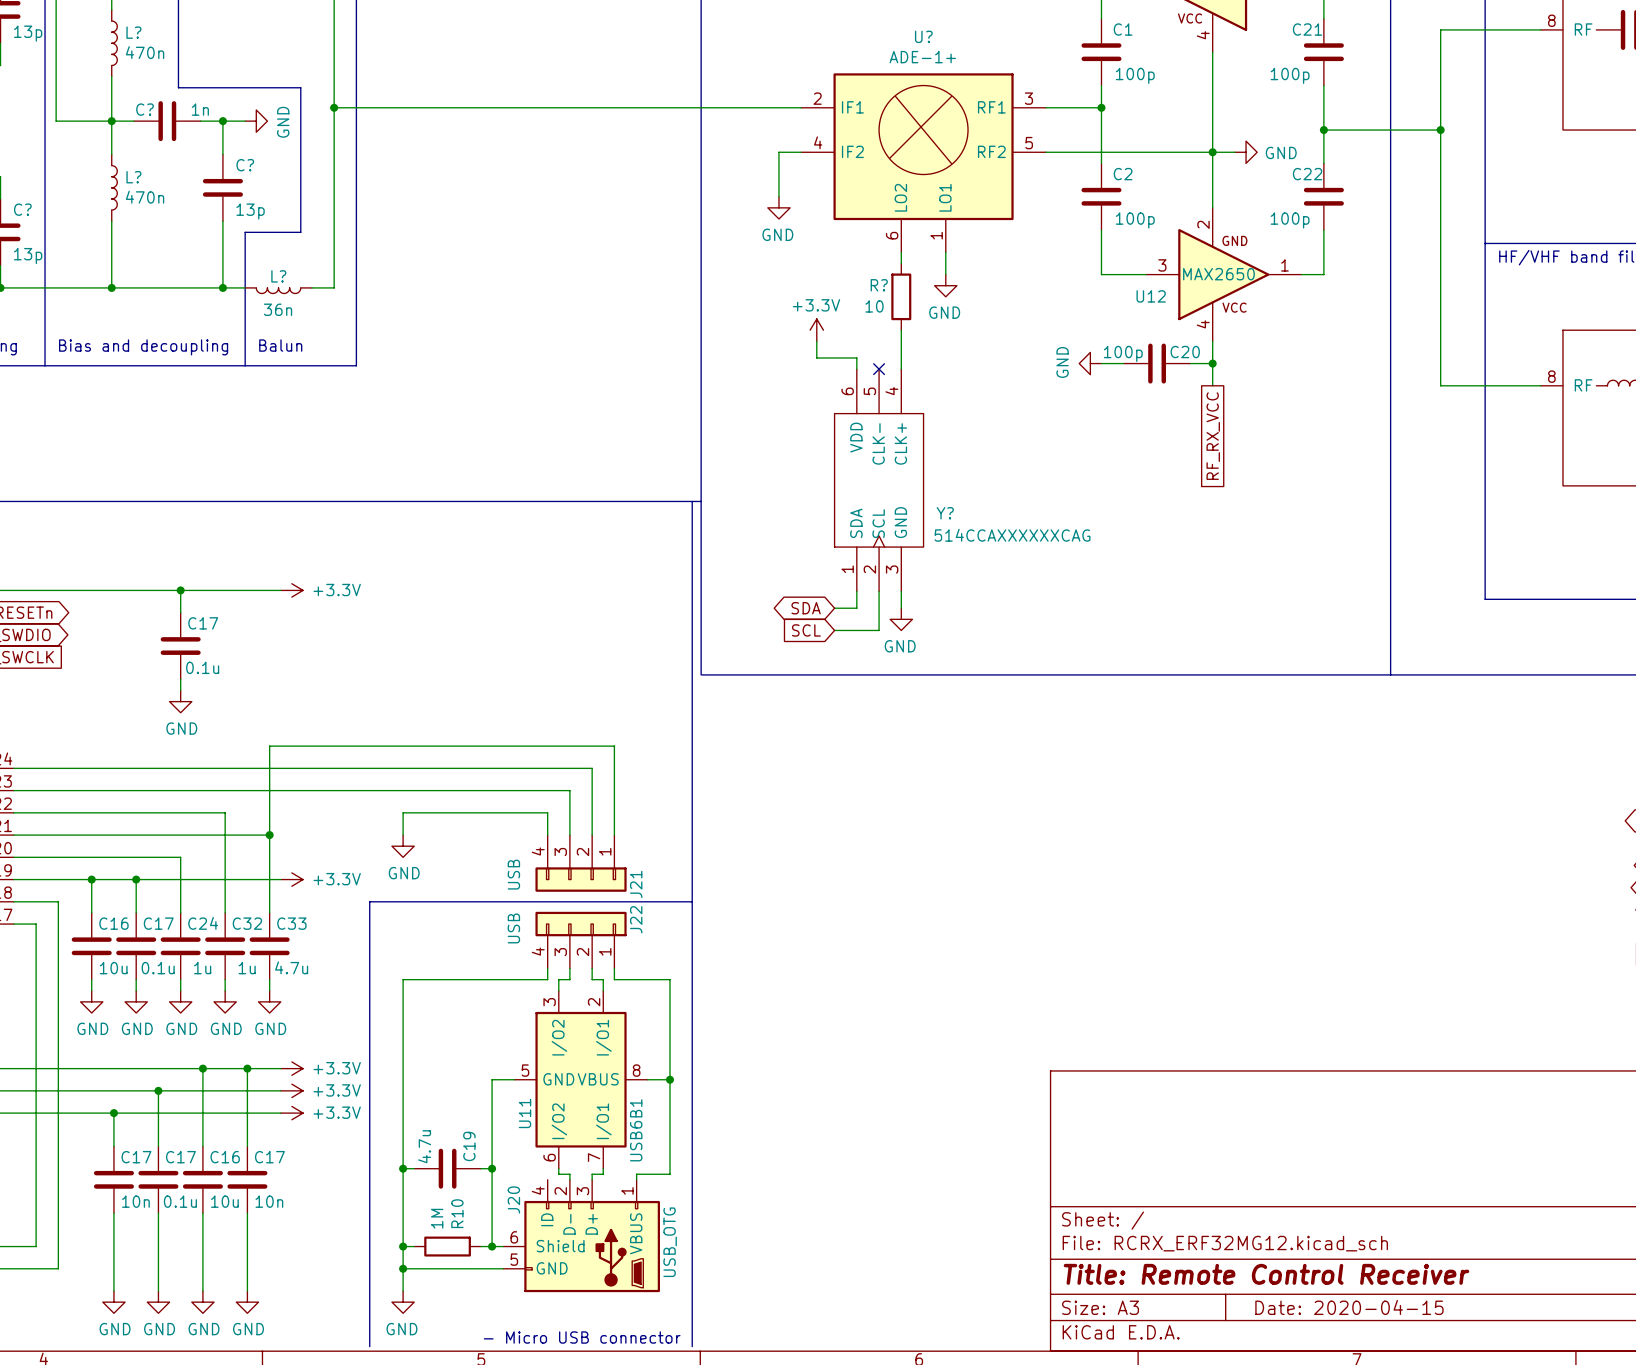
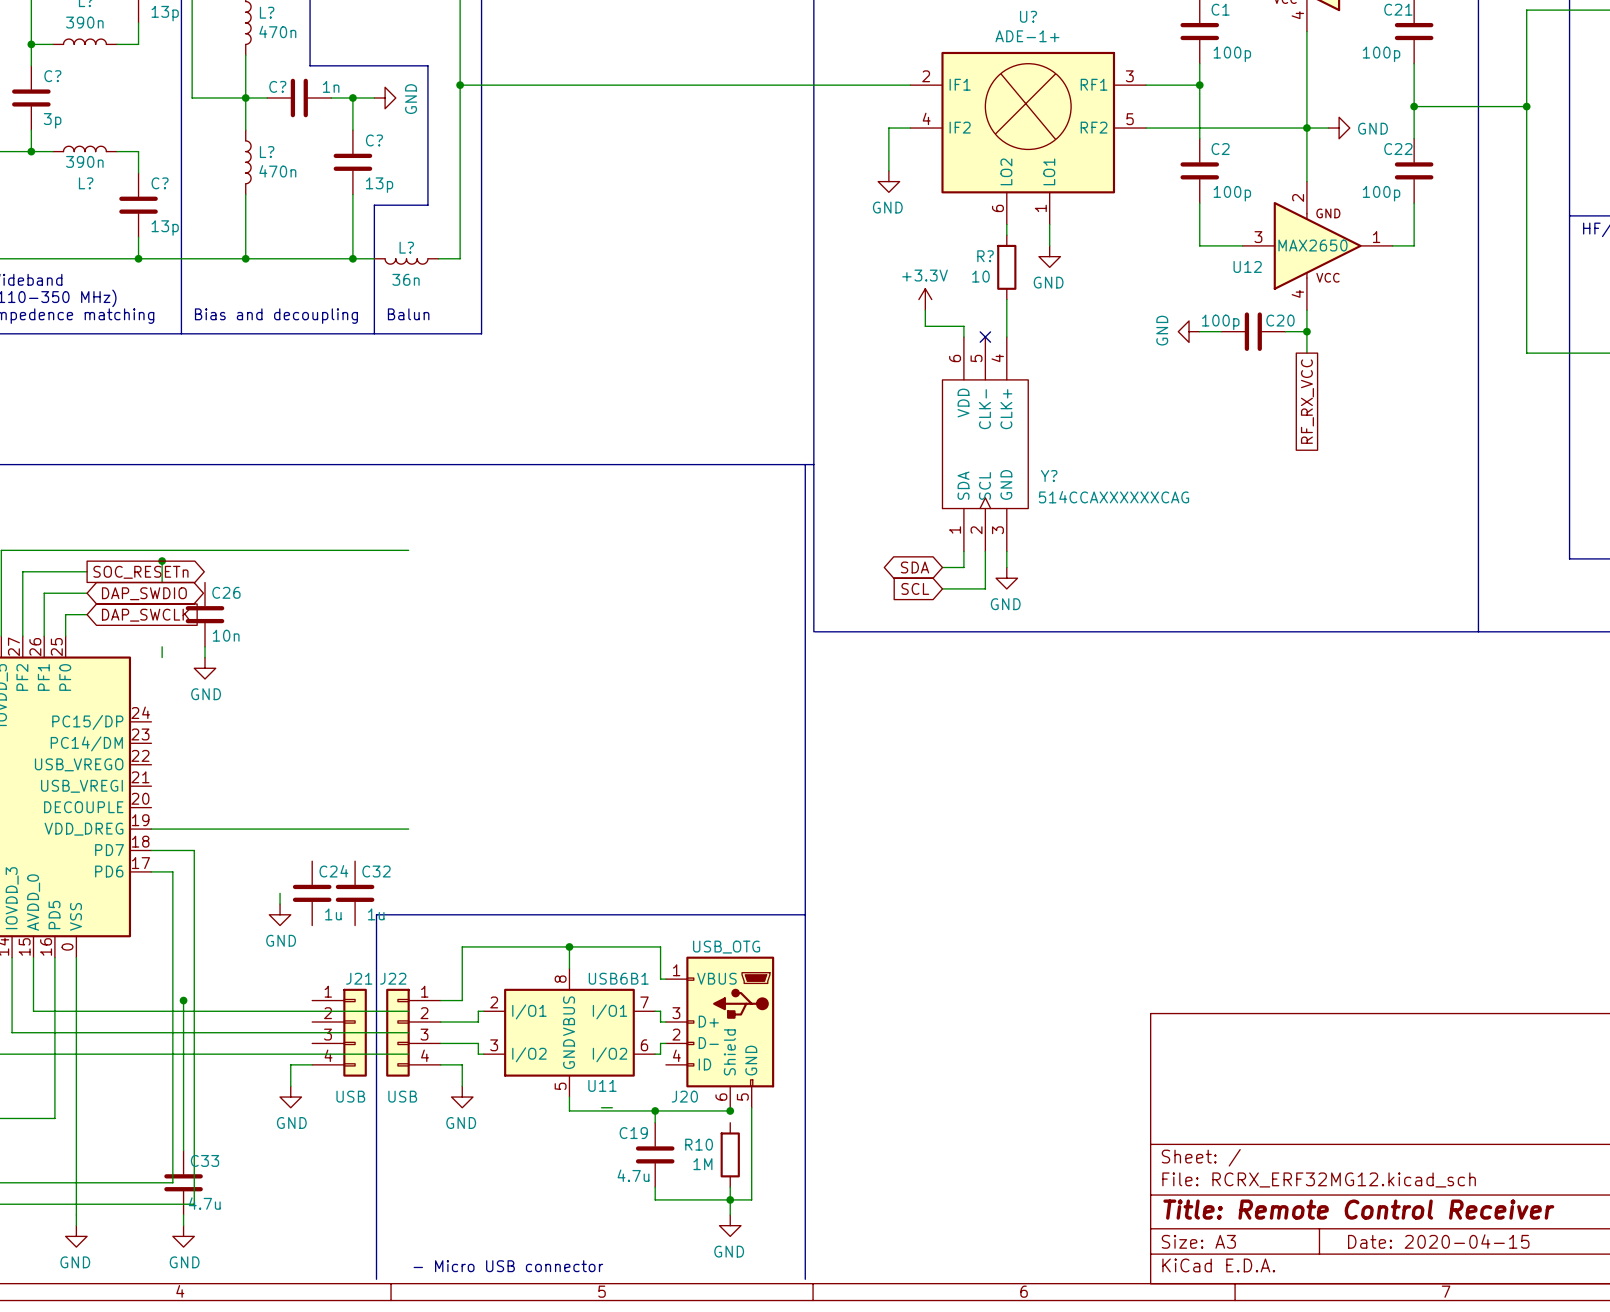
wire: (180, 590) (180, 612) -> (162, 561) (162, 582)
junction: (180, 590) -> none
power symbol: +3.3V (291, 590) -> none
junction: none -> (162, 561)
C17: 0.1u (180, 646) -> none
C26: none -> 10n (205, 614)
wire: (180, 679) (180, 690) -> (162, 646) (162, 657)
wire: none -> (205, 646) (205, 657)
power symbol position: GND (180, 701) -> GND (205, 668)
wire: (13, 768) (592, 768) (592, 835) -> none
wire: (13, 790) (569, 790) (569, 835) -> none
wire: (13, 812) (225, 812) (225, 912) -> none
wire: (13, 835) (269, 835) -> none
junction: (269, 835) -> none
wire: (403, 835) (403, 812) (547, 812) (547, 835) -> none
wire: (614, 835) (614, 746) (269, 746) (269, 912) -> none
power symbol: GND (403, 846) -> none
wire: (13, 857) (180, 857) (180, 912) -> none
J21 position: (581, 863) -> (339, 1032)
wire: (91, 879) (91, 912) -> none
junction: (91, 879) -> none
wire: (136, 879) (136, 912) -> none
junction: (136, 879) -> none
power symbol: +3.3V (291, 879) -> none
J21 rotation: 0° (581, 879) -> 90° counterclockwise (355, 1032)
line: (692, 901) (369, 901) (369, 1346) -> none
J22 rotation: 0° (581, 924) -> 90° counterclockwise (397, 1032)
J22 position: (581, 940) -> (413, 1032)
C16: 10u (91, 946) -> none
C17: 0.1u (136, 946) -> none
C33 position: (269, 946) -> (183, 1182)
power symbol: none -> GND (280, 914)
wire: (547, 968) (547, 979) (403, 979) (403, 1291) -> none
wire: (569, 968) (569, 979) (558, 979) (558, 990) -> none
wire: (592, 968) (592, 979) (603, 979) (603, 990) -> none
wire: (614, 968) (614, 979) (669, 979) (669, 1174) (636, 1174) -> (751, 1107) (751, 1113)
line: none -> (805, 914) (376, 914) (376, 1279)
wire: (91, 979) (91, 990) -> none
wire: (136, 979) (136, 990) -> (280, 893) (280, 904)
wire: (180, 979) (180, 990) -> none
wire: (225, 979) (225, 990) -> none
wire: (269, 979) (269, 990) -> none
power symbol: GND (91, 1001) -> none
power symbol: GND (136, 1001) -> none
power symbol: GND (180, 1001) -> none
power symbol: GND (225, 1001) -> none
power symbol: GND (269, 1001) -> none
wire: none -> (569, 946) (569, 968)
junction: none -> (569, 946)
wire: none -> (665, 979) (660, 979) (660, 946) (462, 946) (462, 1000) (440, 1000)
wire: none -> (183, 1000) (183, 1150)
junction: none -> (183, 1000)
wire: (202, 1068) (202, 1146) -> none
junction: (202, 1068) -> none
junction: (247, 1068) -> none
power symbol: +3.3V (291, 1068) -> none
wire: none -> (483, 1011) (478, 1011) (478, 1022) (440, 1022)
wire: (514, 1079) (492, 1079) (492, 1246) -> none
U11 rotation: 0° (581, 1079) -> 90° counterclockwise (569, 1032)
U11 position: (581, 1079) -> (569, 1032)
junction: (669, 1079) -> none
wire: (158, 1090) (158, 1124) -> (312, 1064) (290, 1064)
junction: (158, 1090) -> none
power symbol: +3.3V (291, 1090) -> none
wire: none -> (440, 1043) (478, 1043) (478, 1054) (483, 1054)
wire: (113, 1113) (113, 1146) -> none
junction: (113, 1113) -> none
power symbol: +3.3V (291, 1113) -> none
wire: none -> (440, 1064) (462, 1064) (462, 1086)
C19 value position: 4.7u (424, 1146) -> 4.7u (633, 1175)
C19 name position: C19 (469, 1146) -> C19 (633, 1133)
power symbol: none -> GND (290, 1097)
power symbol: none -> GND (462, 1097)
wire: none -> (569, 1097) (569, 1110) (730, 1110)
wire: (403, 1168) (414, 1168) -> none
junction: (403, 1168) -> none
C19 rotation: 0° (447, 1168) -> 90° clockwise (655, 1154)
C19 position: (447, 1168) -> (655, 1154)
junction: (492, 1168) -> none
wire: (558, 1168) (558, 1174) (569, 1174) (569, 1179) -> none
wire: (603, 1168) (603, 1174) (592, 1174) (592, 1179) -> none
wire: none -> (655, 1110) (655, 1122)
junction: none -> (655, 1110)
junction: none -> (730, 1110)
C17: 10n (113, 1179) -> none
C17: 0.1u (158, 1179) -> none
C16: 10u (202, 1179) -> none
C17: 10n (247, 1179) -> none
wire: (113, 1213) (113, 1291) -> none
wire: (158, 1213) (158, 1291) -> none
wire: (202, 1213) (202, 1291) -> none
R10 name position: R10 (457, 1213) -> R10 (699, 1144)
R10 value position: 1M (437, 1218) -> 1M (702, 1164)
J20 position: (581, 1235) -> (720, 1032)
wire: (403, 1246) (414, 1246) -> none
junction: (403, 1246) -> none
R10 rotation: 0° (447, 1246) -> 90° clockwise (730, 1154)
R10 position: (447, 1246) -> (730, 1154)
wire: (480, 1246) (503, 1246) -> none
junction: (492, 1246) -> none
J20 rotation: 0° (592, 1246) -> 90° counterclockwise (730, 1022)
junction: none -> (730, 1199)
wire: (403, 1268) (503, 1268) -> none
junction: (403, 1268) -> none
wire: none -> (183, 1214) (183, 1225)
power symbol: none -> GND (730, 1225)
power symbol: none -> GND (183, 1236)
power symbol: GND (113, 1302) -> none
power symbol: GND (158, 1302) -> none
power symbol: GND (202, 1302) -> none
power symbol: GND (247, 1302) -> none
power symbol: GND (403, 1302) -> none
text position: - Micro USB connector (582, 1337) -> - Micro USB connector (508, 1266)

